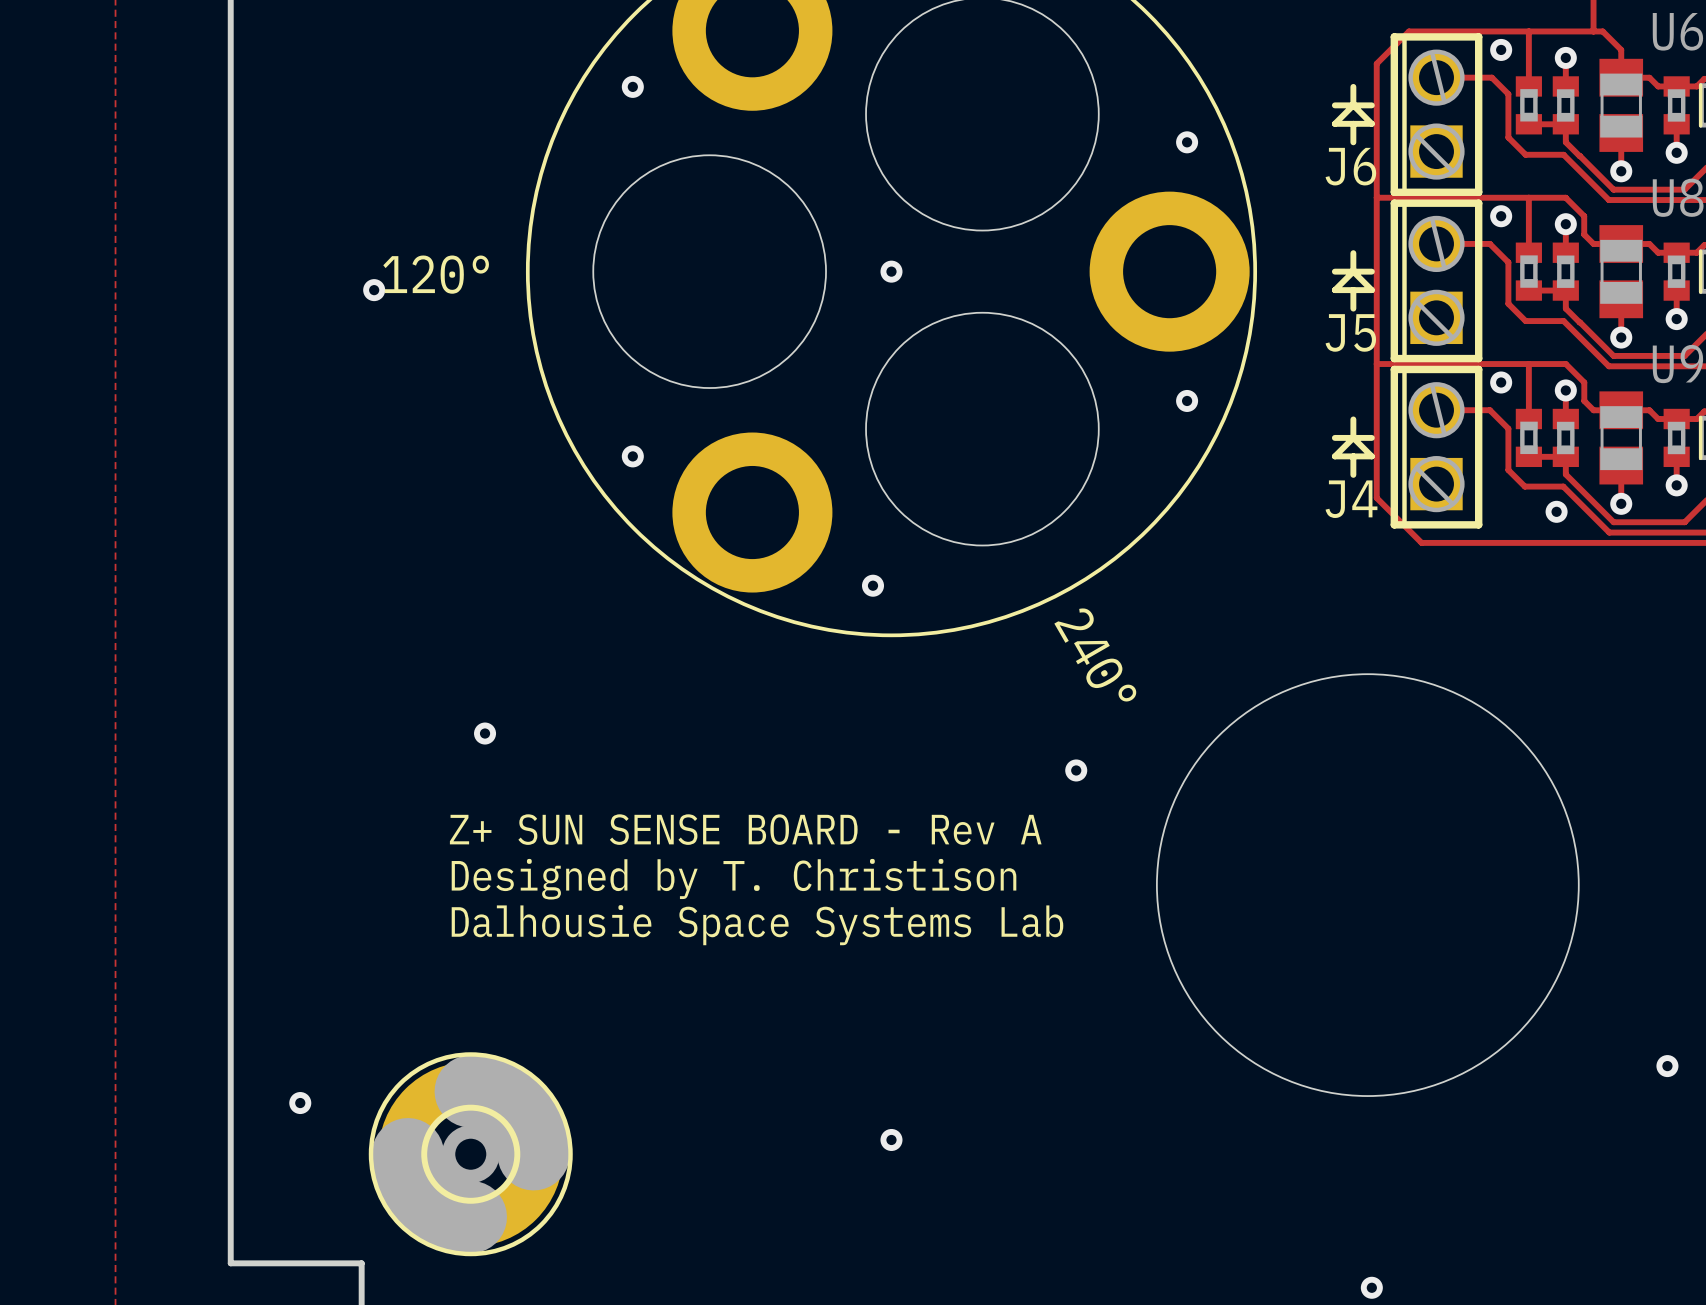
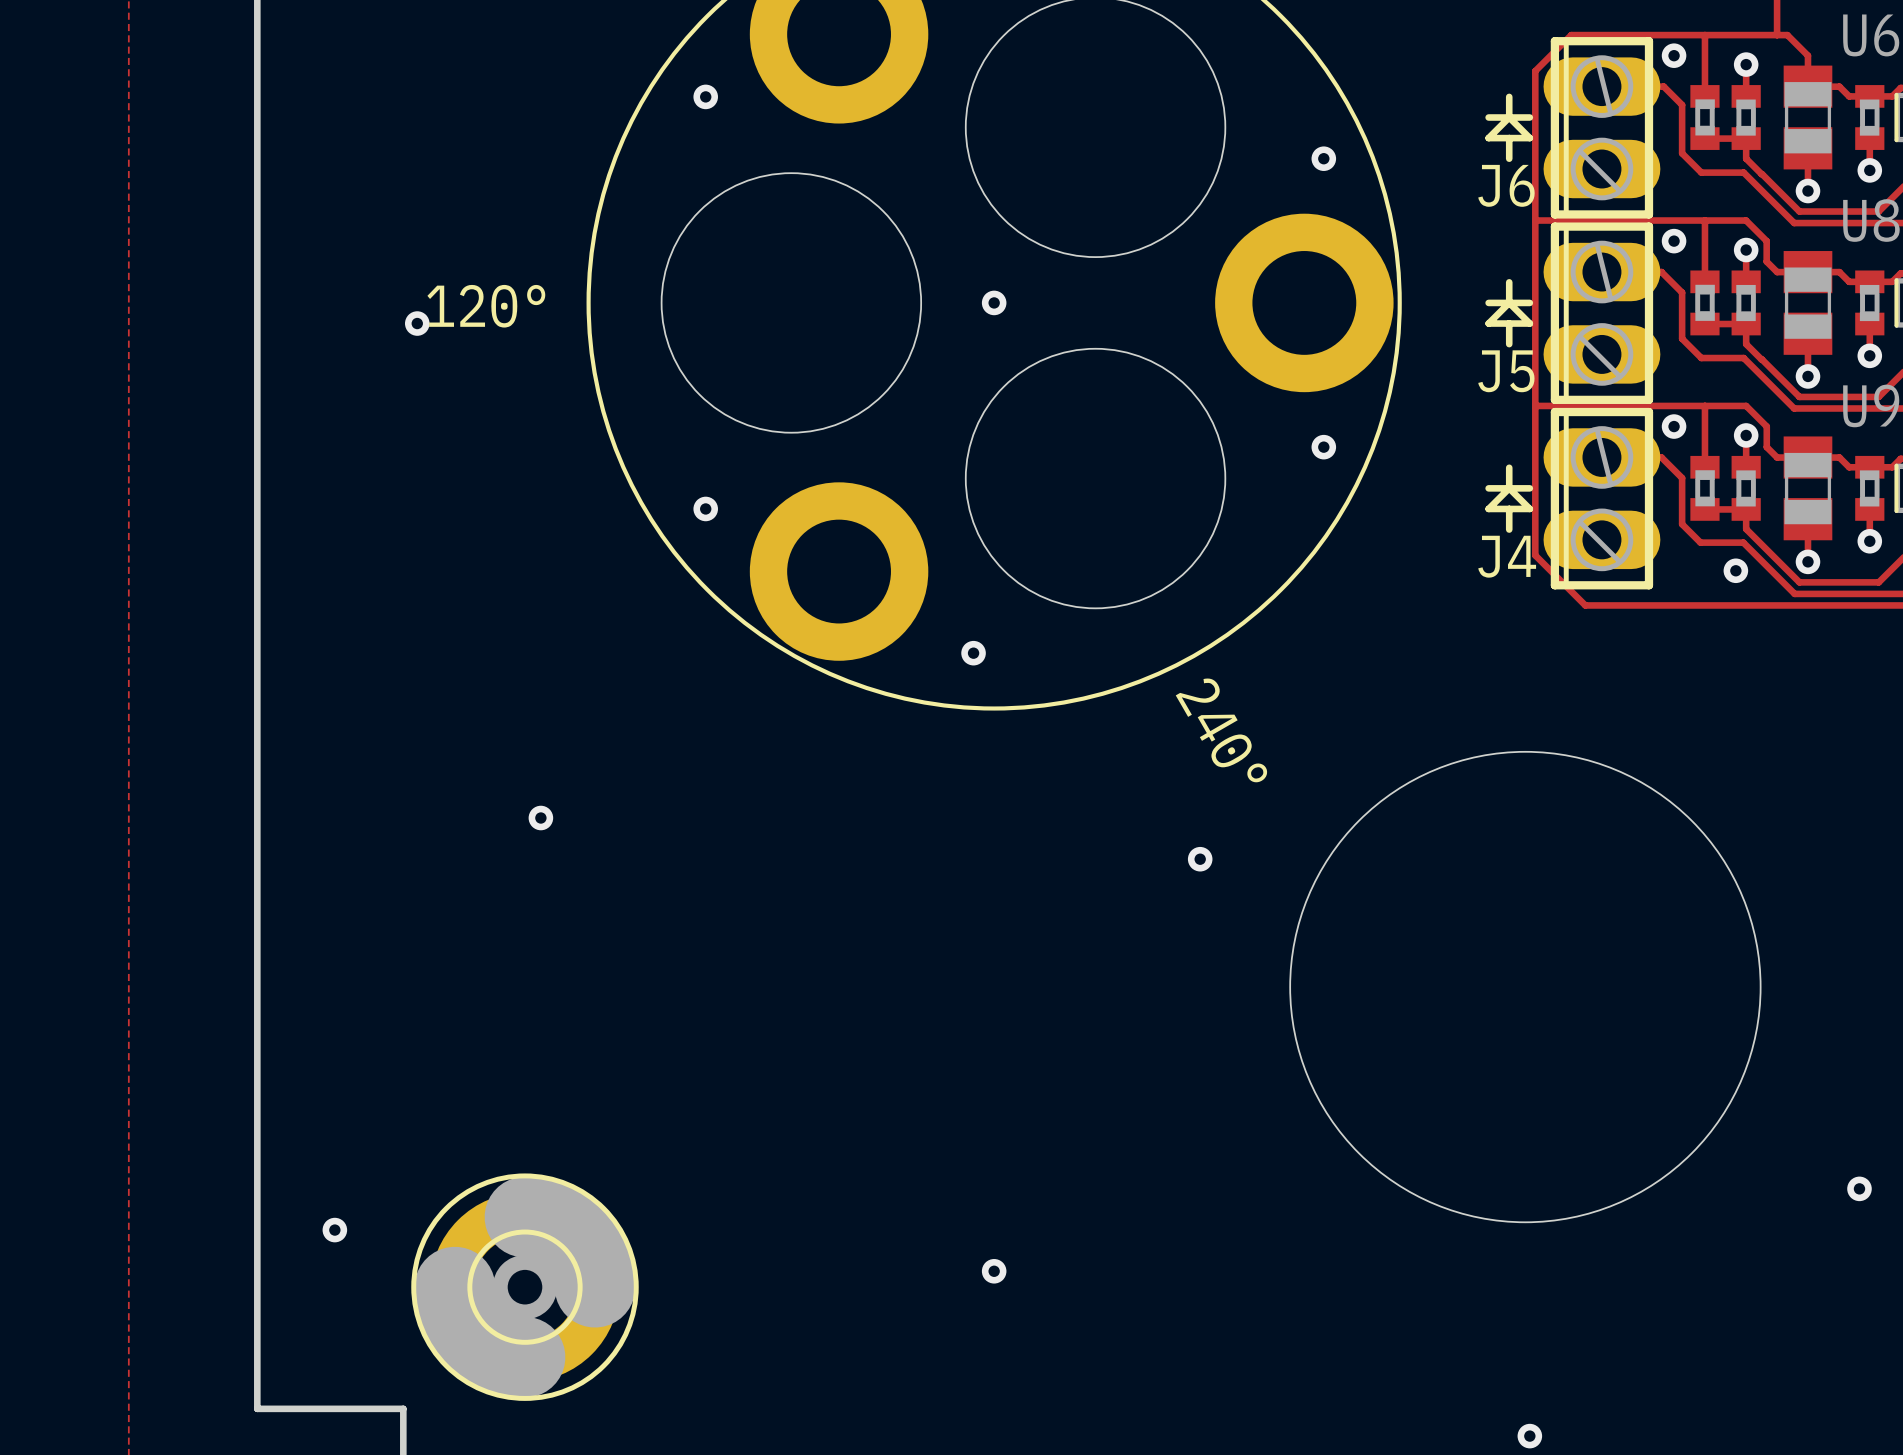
J6 footprint: [1390, 33, 1483, 196] -> [1543, 37, 1661, 219]
J5 footprint: [1390, 199, 1483, 363] -> [1543, 222, 1661, 404]
J4 footprint: [1390, 365, 1483, 529] -> [1543, 407, 1661, 590]
text: Z+ SUN SENSE BOARD - Rev A (745, 829) -> none
text: Designed by T. Christison (734, 879) -> none
text: Dalhousie Space Systems Lab (757, 925) -> none
part footprint: [368, 1052, 573, 1257] -> [411, 1173, 639, 1401]

